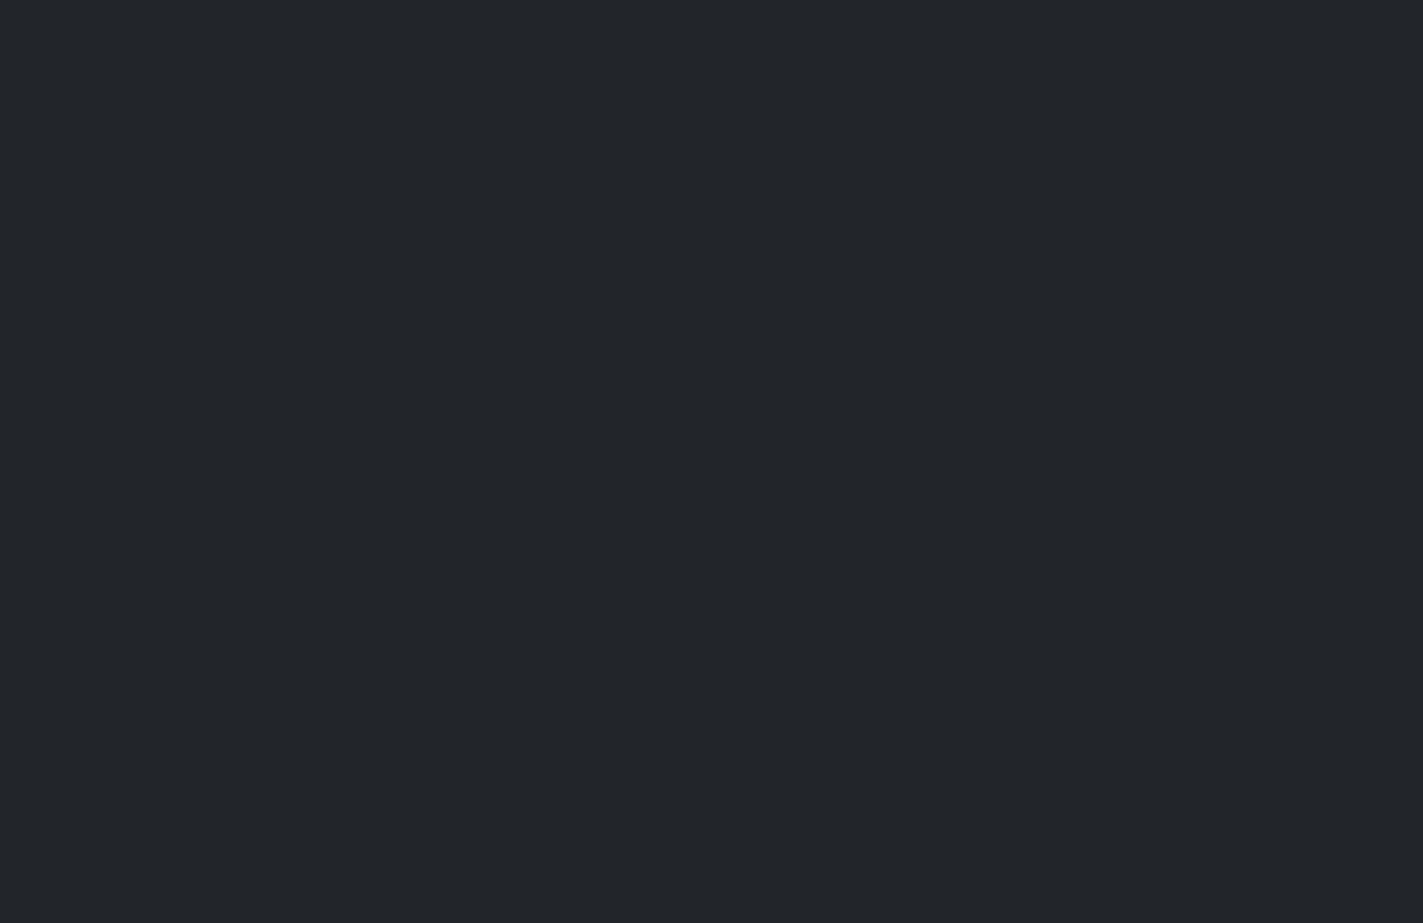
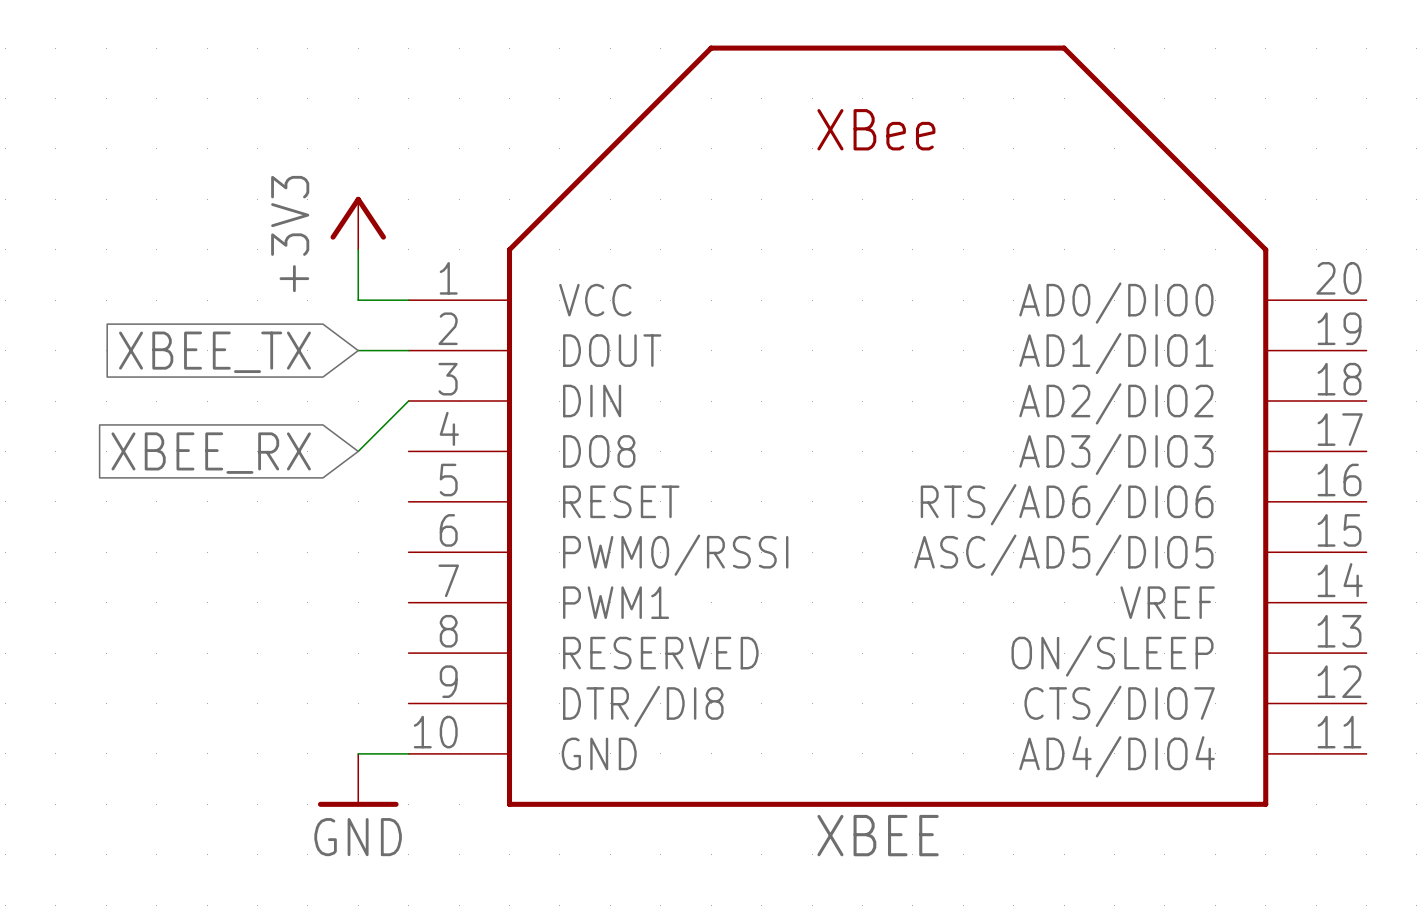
power symbol: none -> +3V3 (358, 223)
wire: none -> (358, 249) (358, 300) (408, 300)
wire: none -> (358, 350) (408, 350)
global label: none -> XBEE_TX (214, 352)
wire: none -> (408, 401) (358, 451)
XBEE: none -> (887, 426)
global label: none -> XBEE_RX (211, 453)
wire: none -> (358, 753) (408, 753)
power symbol: none -> GND (358, 780)

